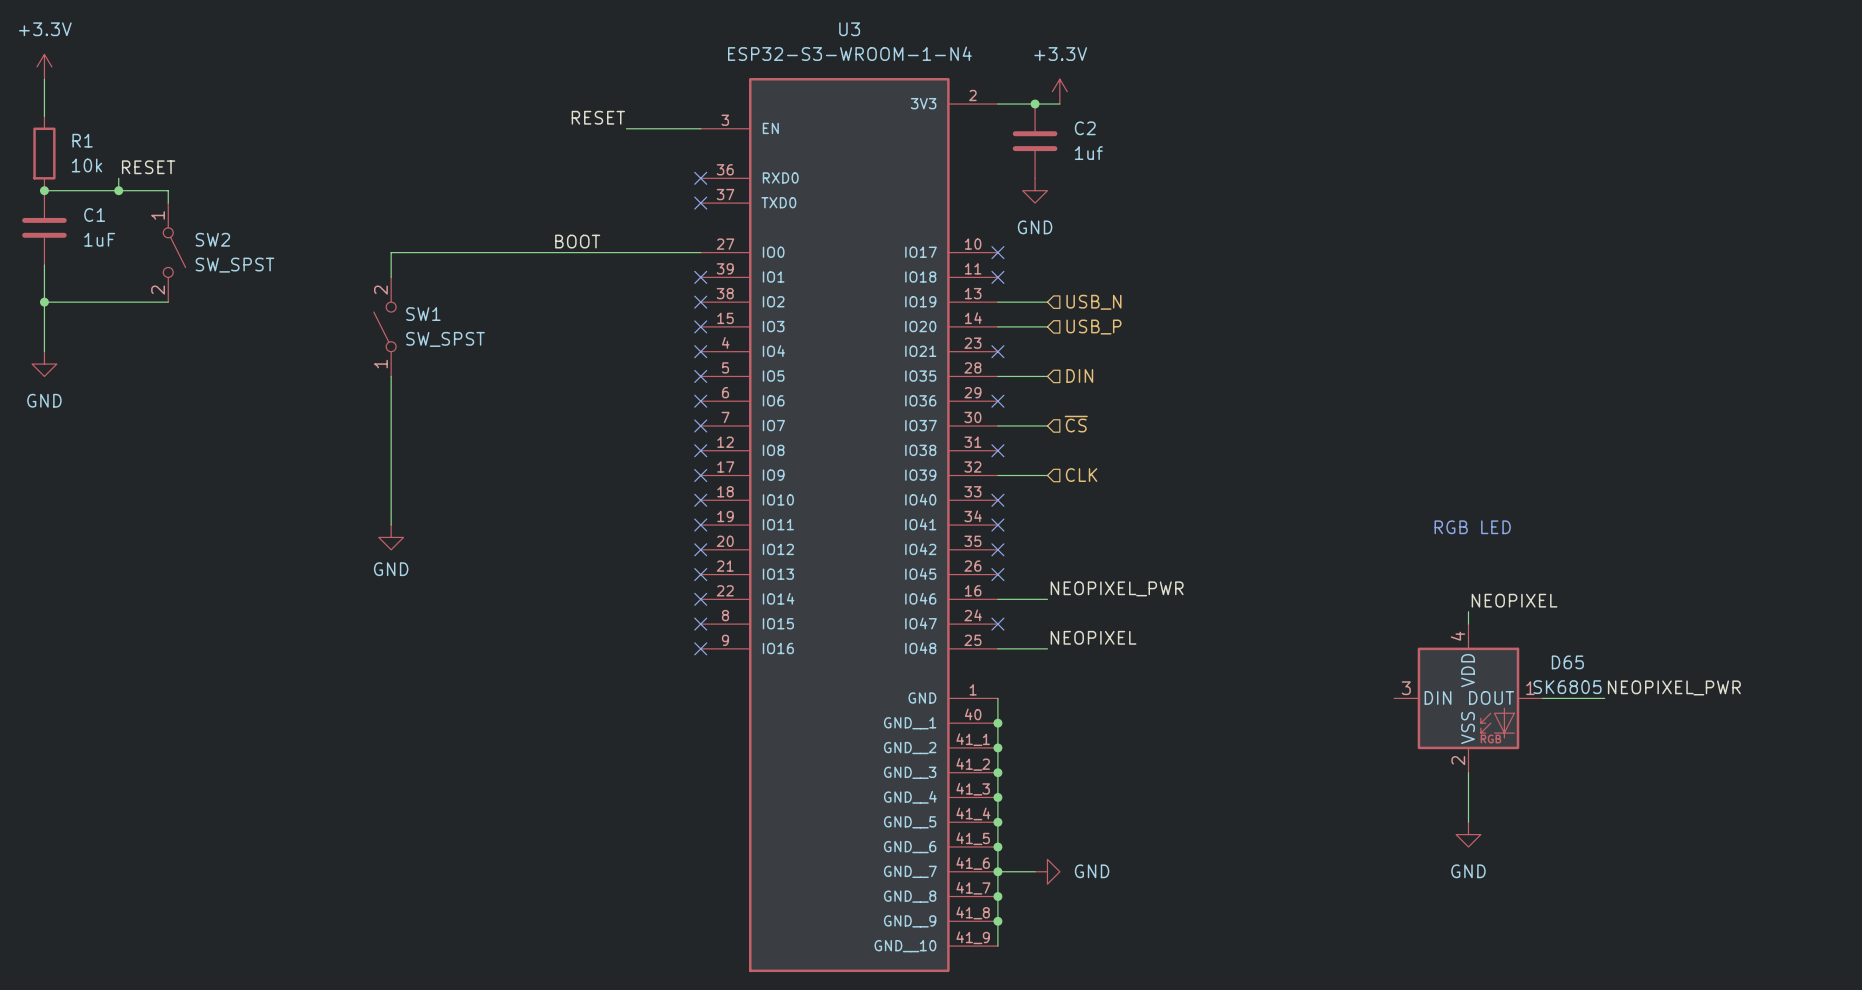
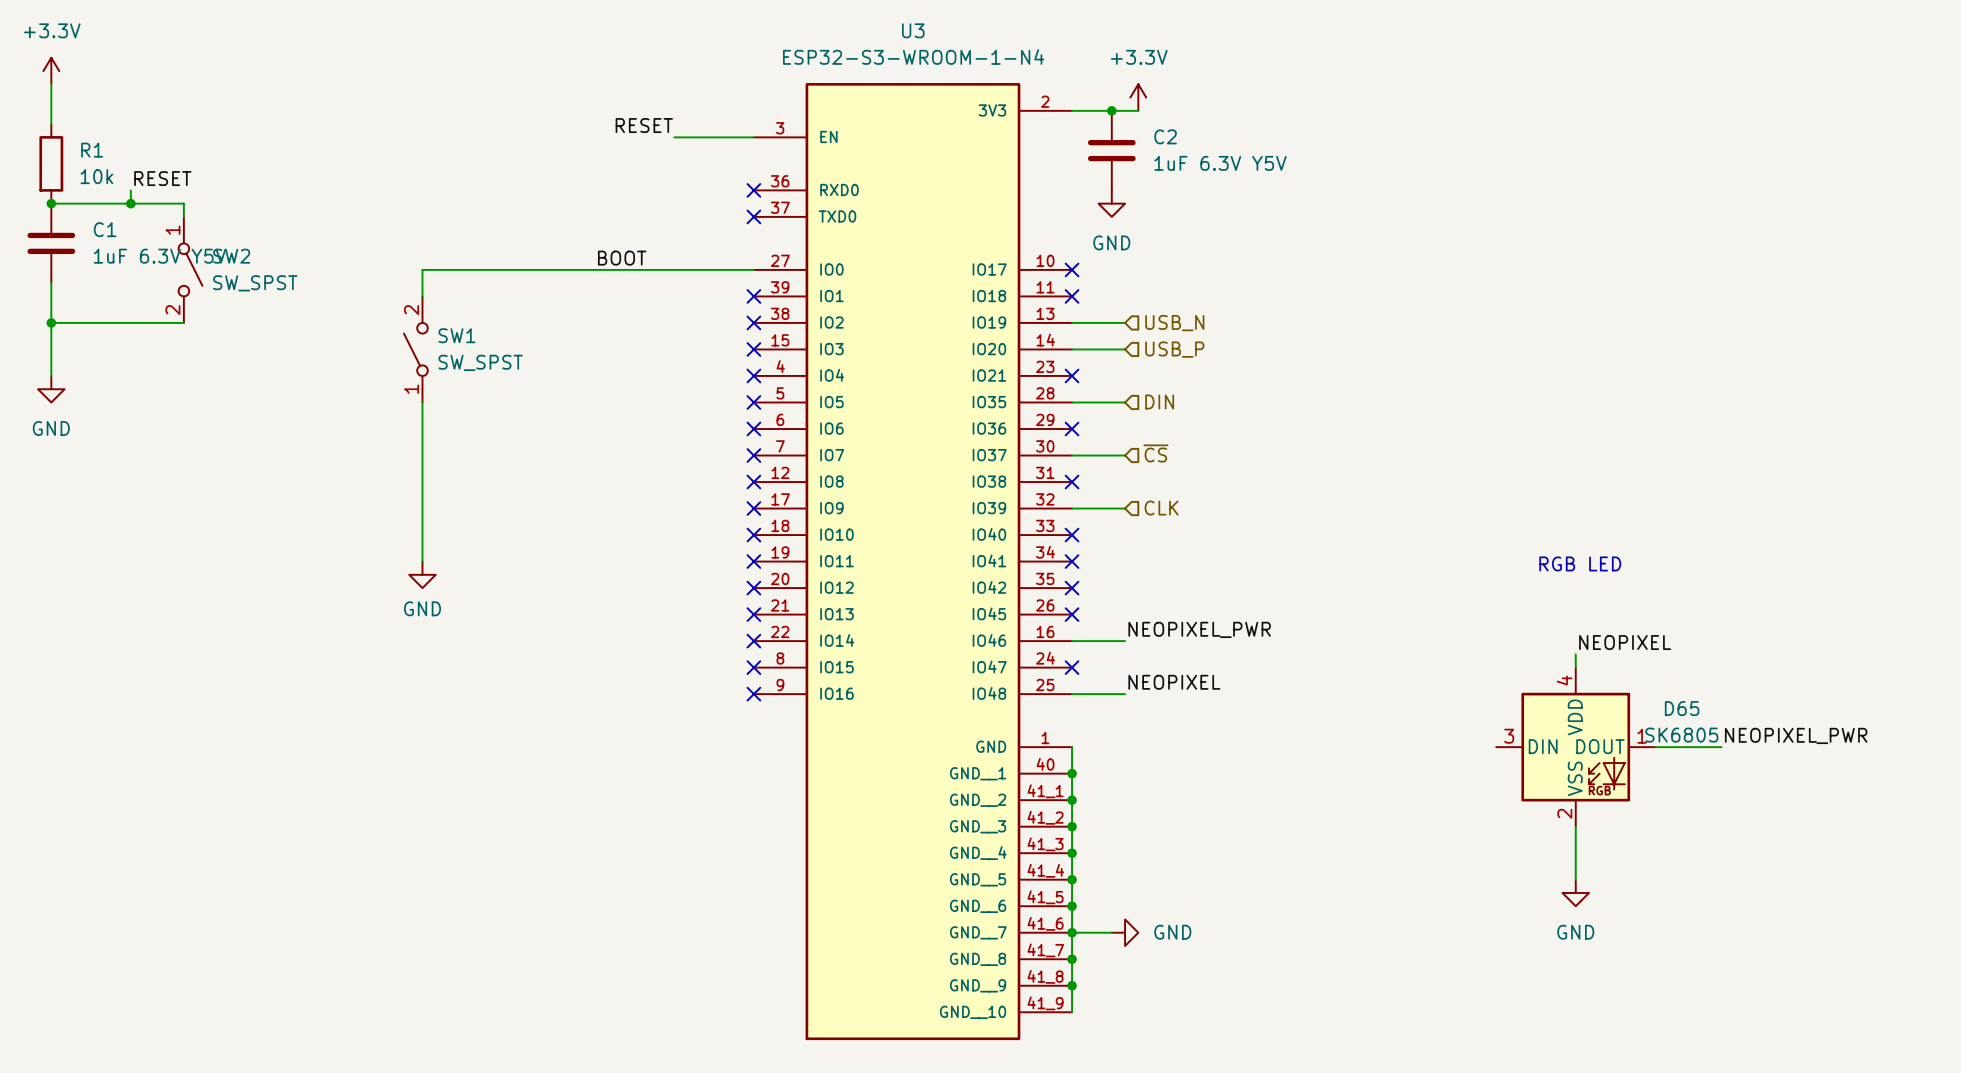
C2 value: 1uf (1088, 153) -> 1uF 6.3V Y5V (1220, 163)
C1 value: 1uF (99, 239) -> 1uF 6.3V Y5V (159, 256)

